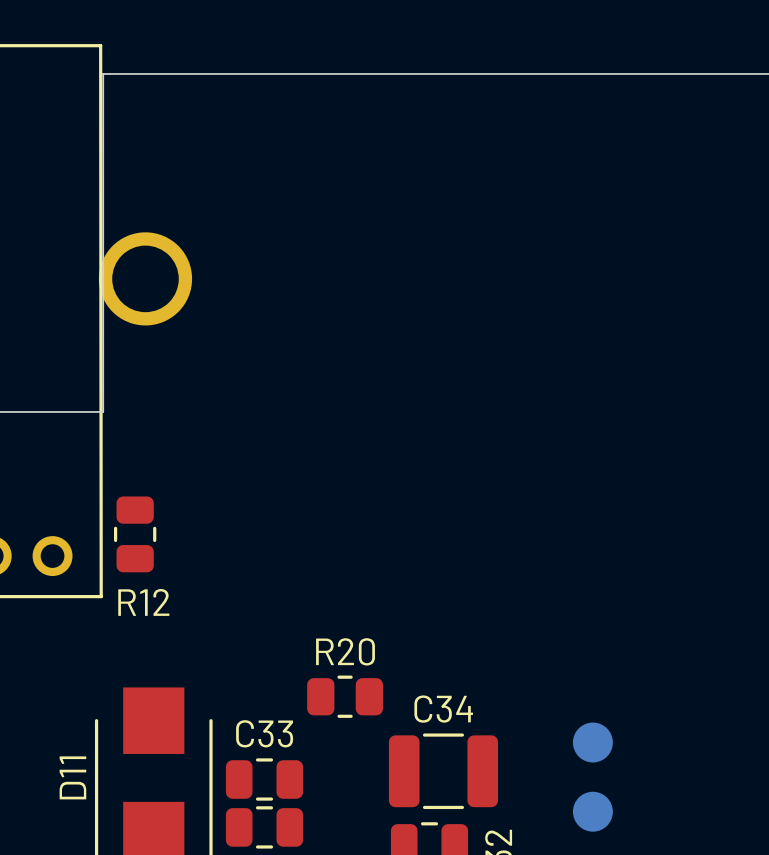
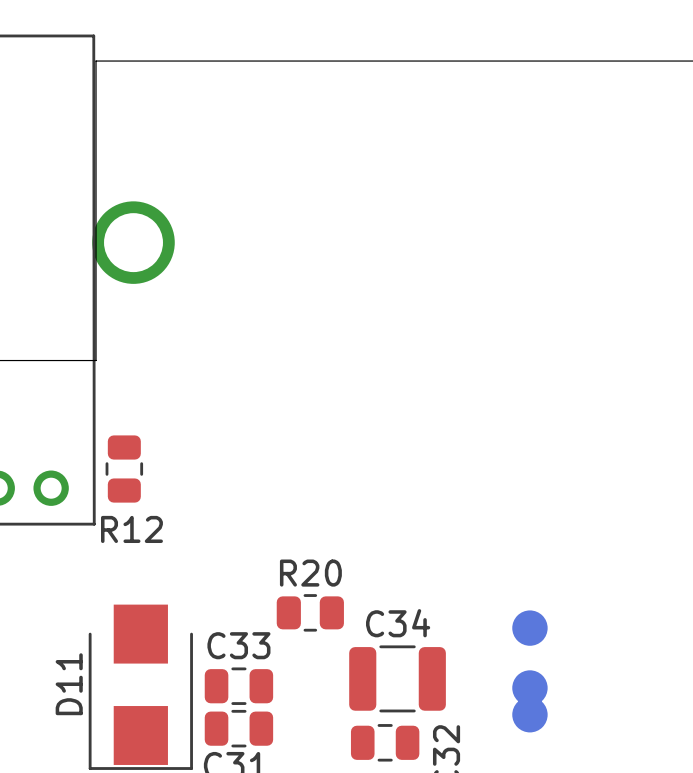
part: none -> (529, 628)
part: (592, 742) -> none
part: none -> (529, 688)

